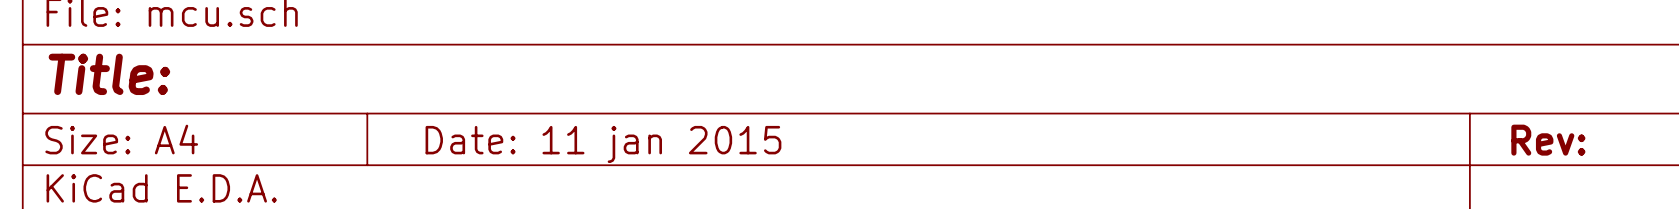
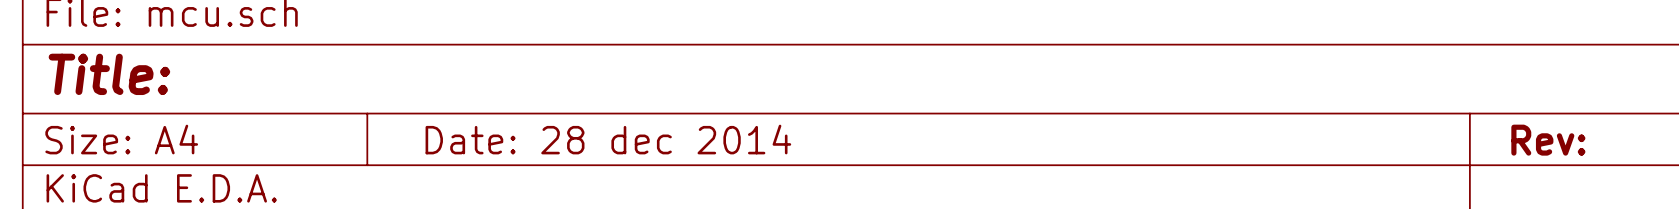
title block: Date: 11 jan 2015 (603, 144) -> Date: 28 dec 2014 (608, 139)

